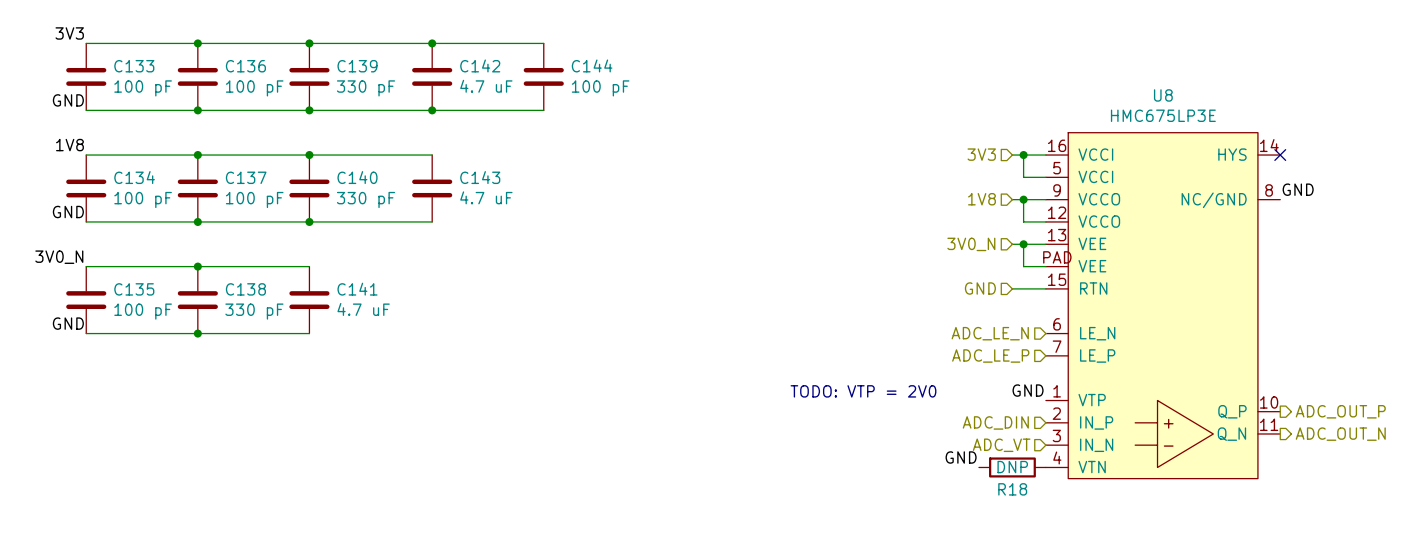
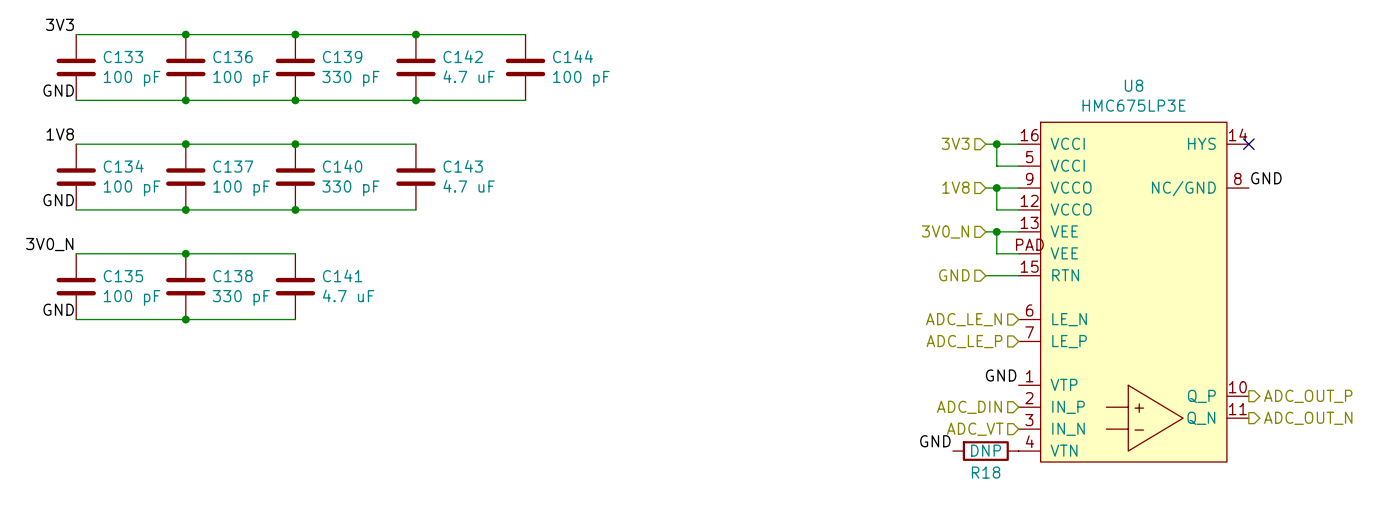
text: TODO: VTP = 2V0 (863, 391) -> none

